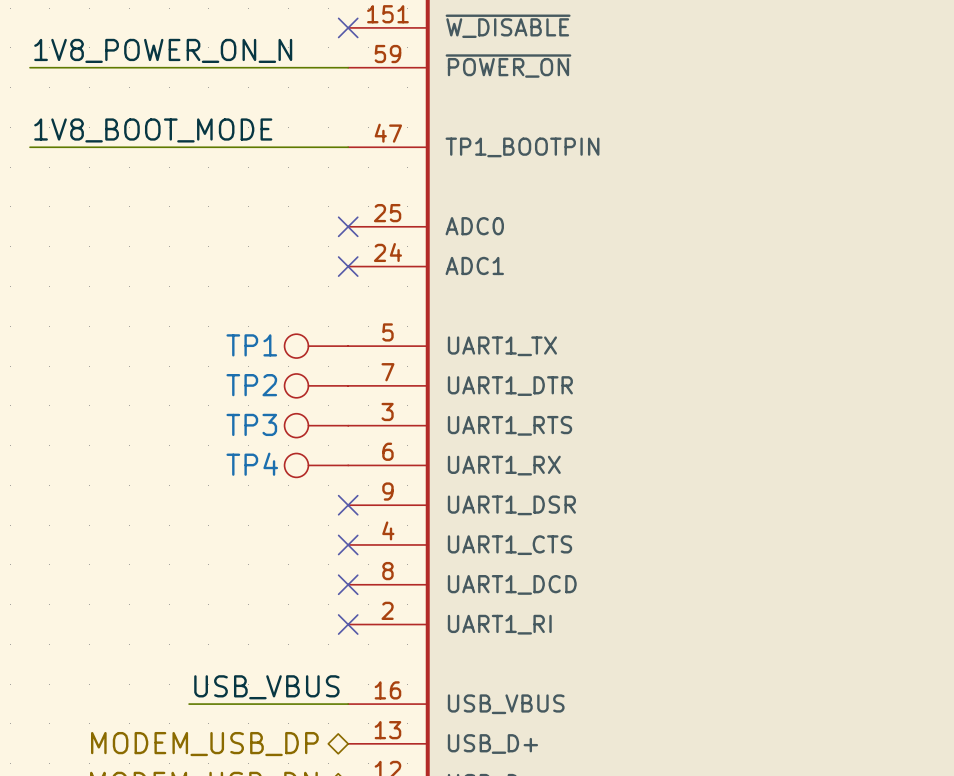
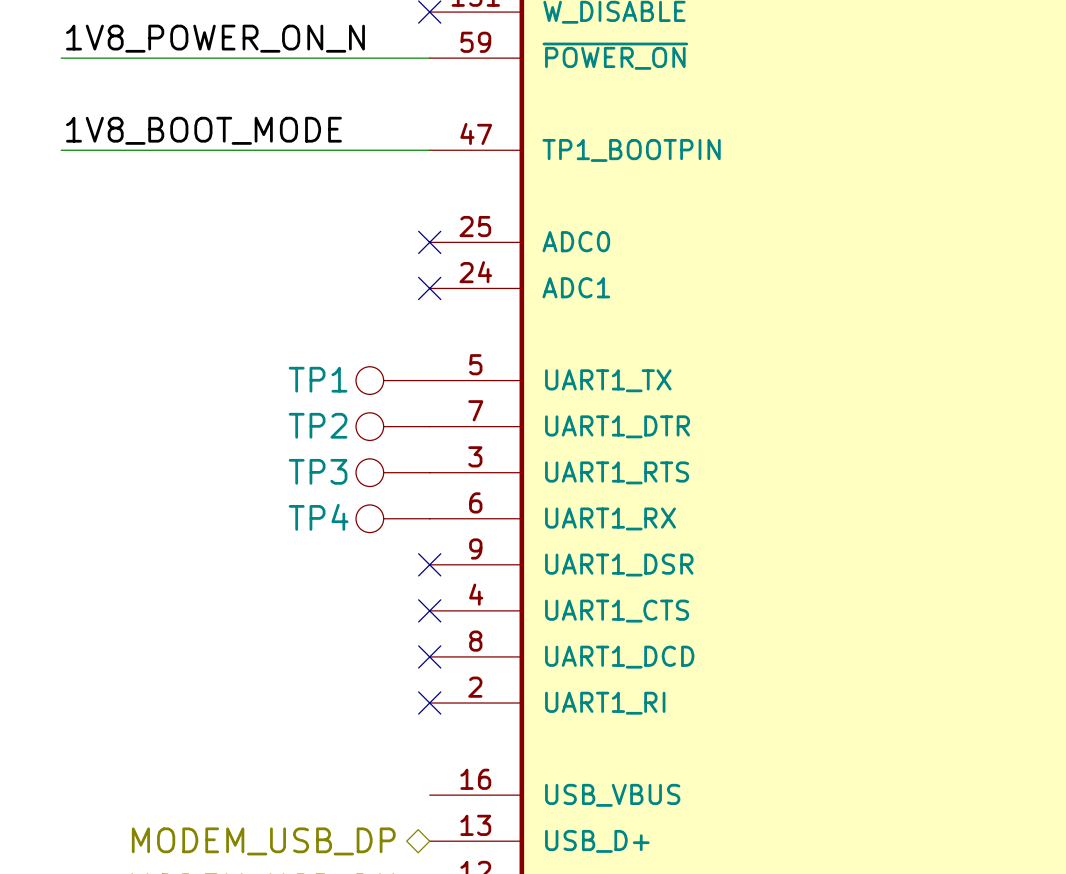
label: USB_VBUS (266, 687) -> none
wire: (189, 704) (348, 704) -> none

